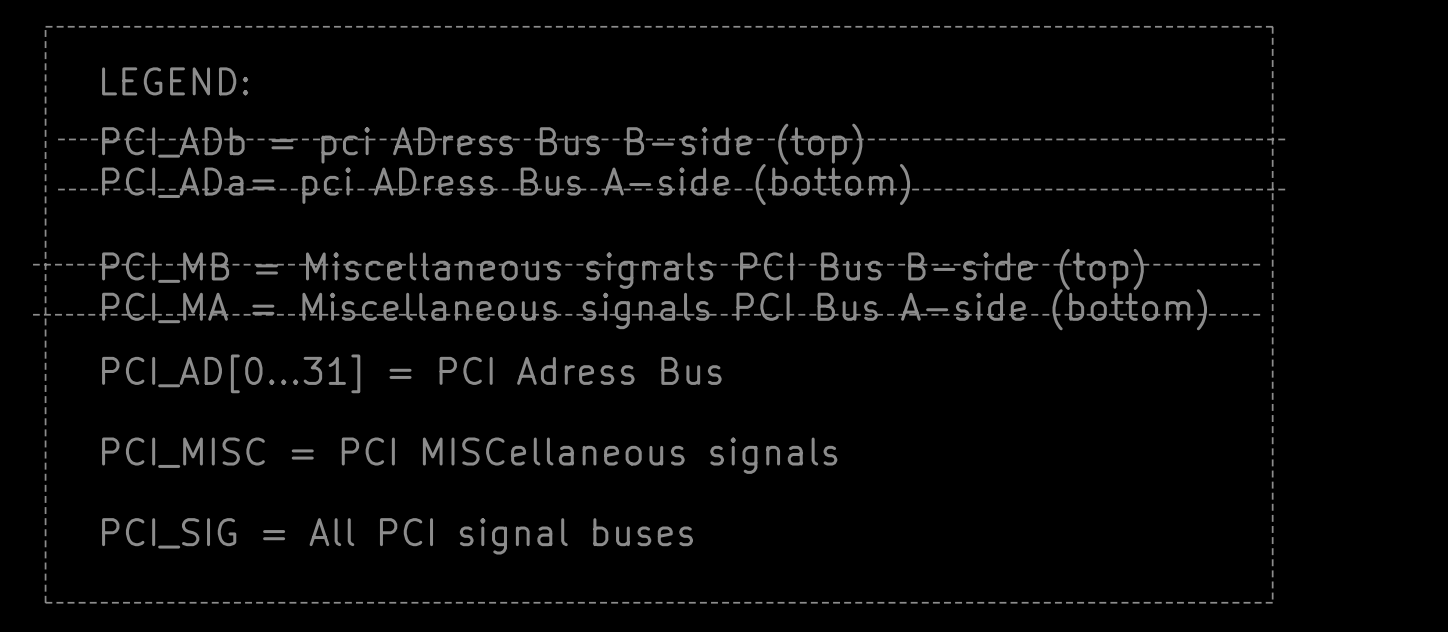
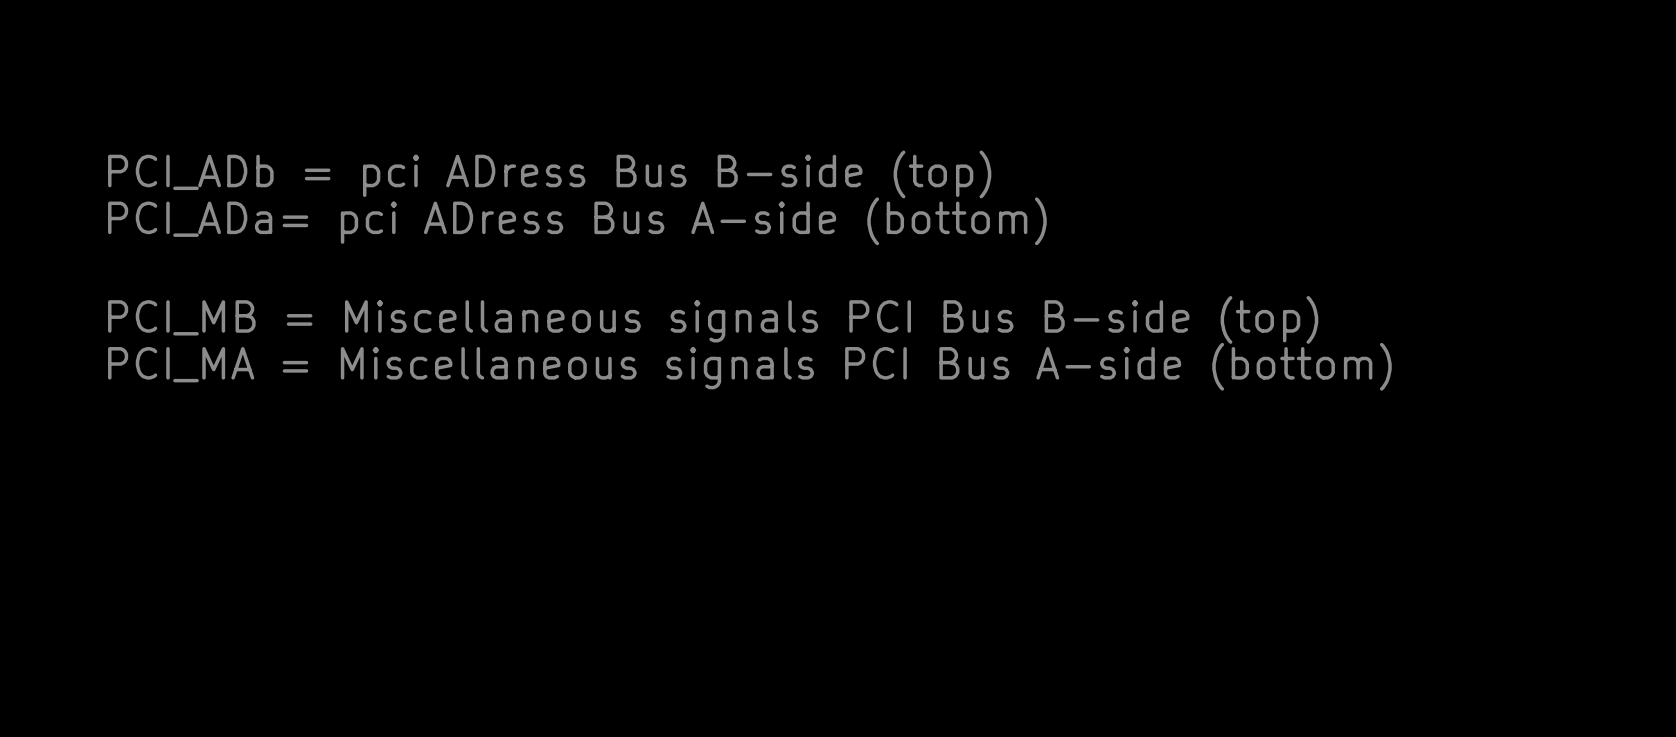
line: (45, 26) (1272, 26) (1272, 602) (45, 602) (45, 26) -> none
text: LEGEND: (175, 81) -> none
line: (58, 139) (1285, 139) -> none
line: (58, 189) (1285, 189) -> none
line: (33, 264) (1260, 264) -> none
line: (33, 314) (1260, 314) -> none
text: PCI_AD[0...31] = PCI Adress Bus (411, 373) -> none
text: PCI_MISC = PCI MISCellaneous signals (469, 455) -> none
text: PCI_SIG = All PCI signal buses (397, 536) -> none

